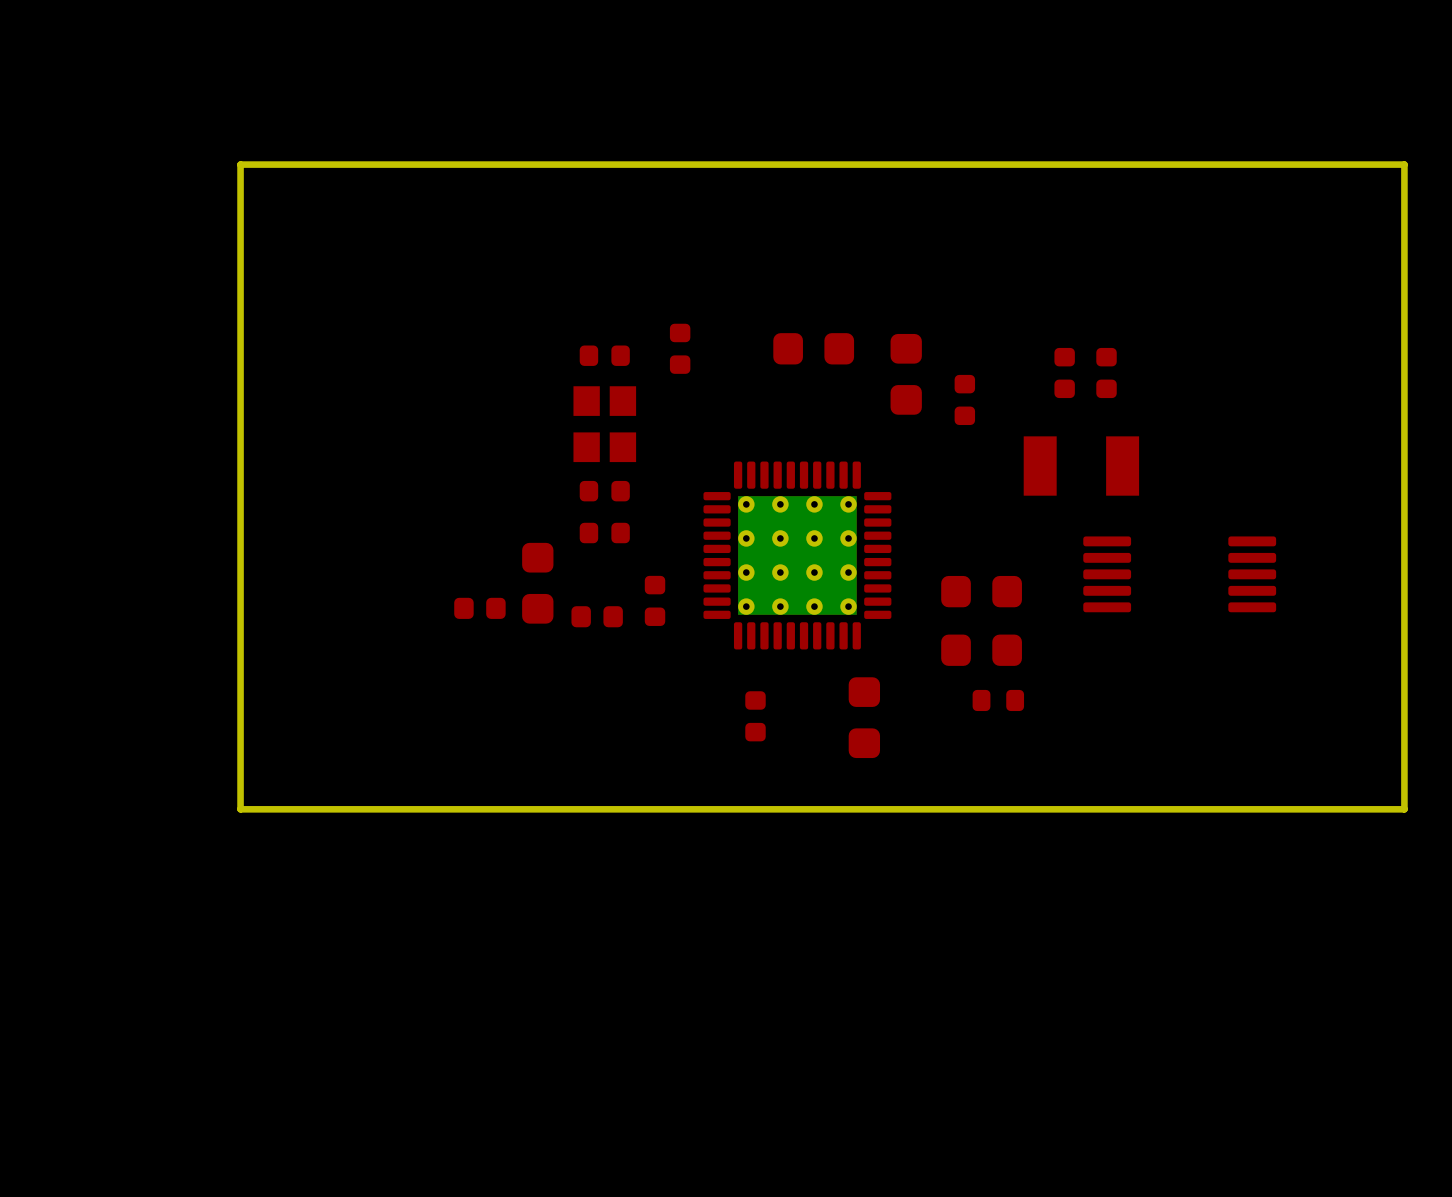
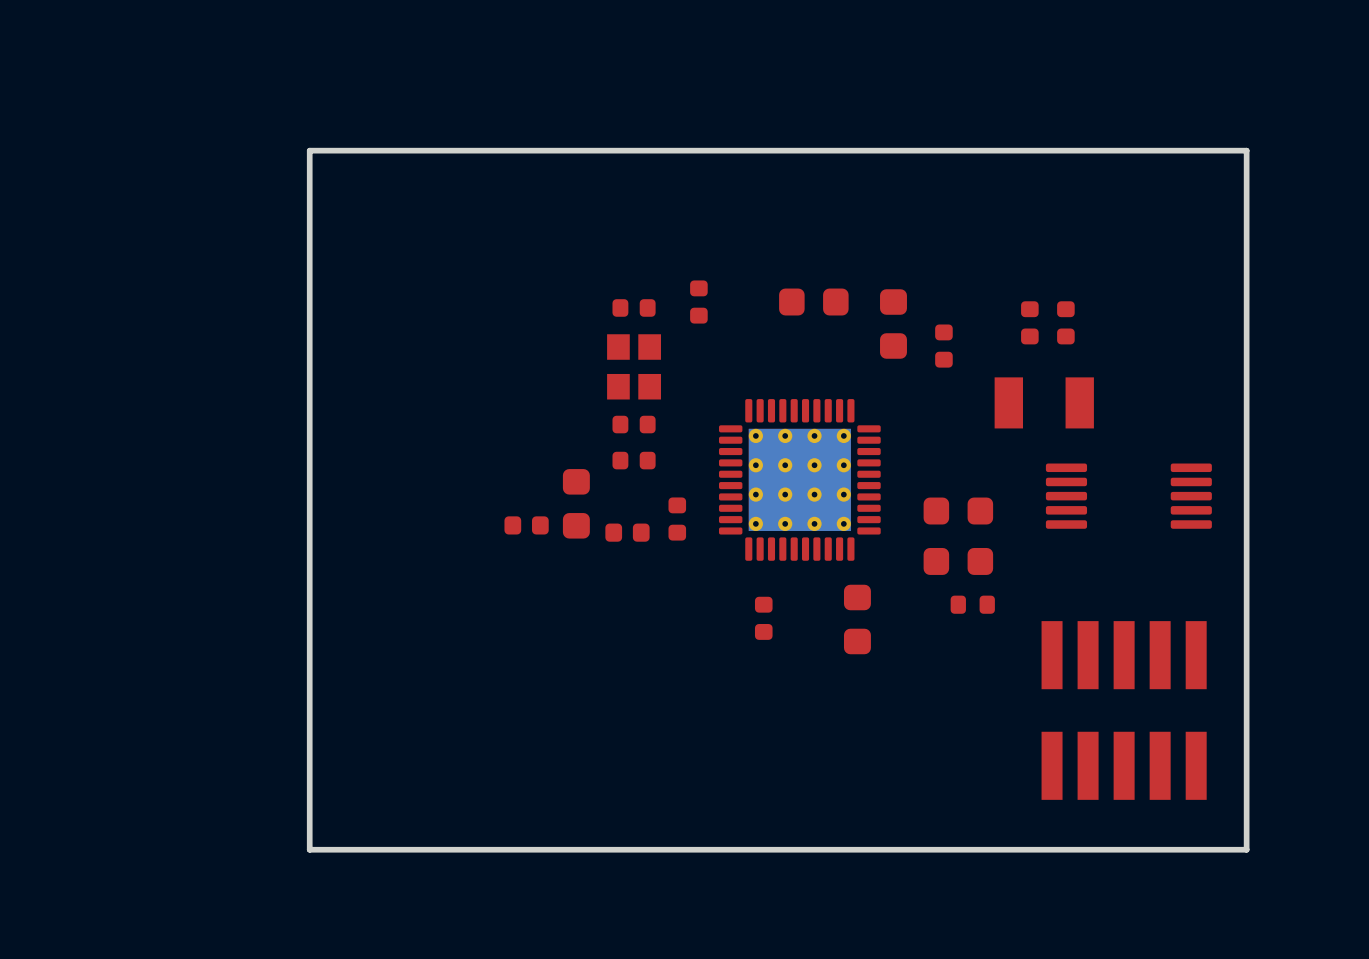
board edge: (1404, 164) (240, 164) (240, 809) (1404, 809) (1404, 164) -> (1246, 150) (1246, 849) (309, 849) (309, 150) (1246, 150)
part: none -> (1124, 710)

